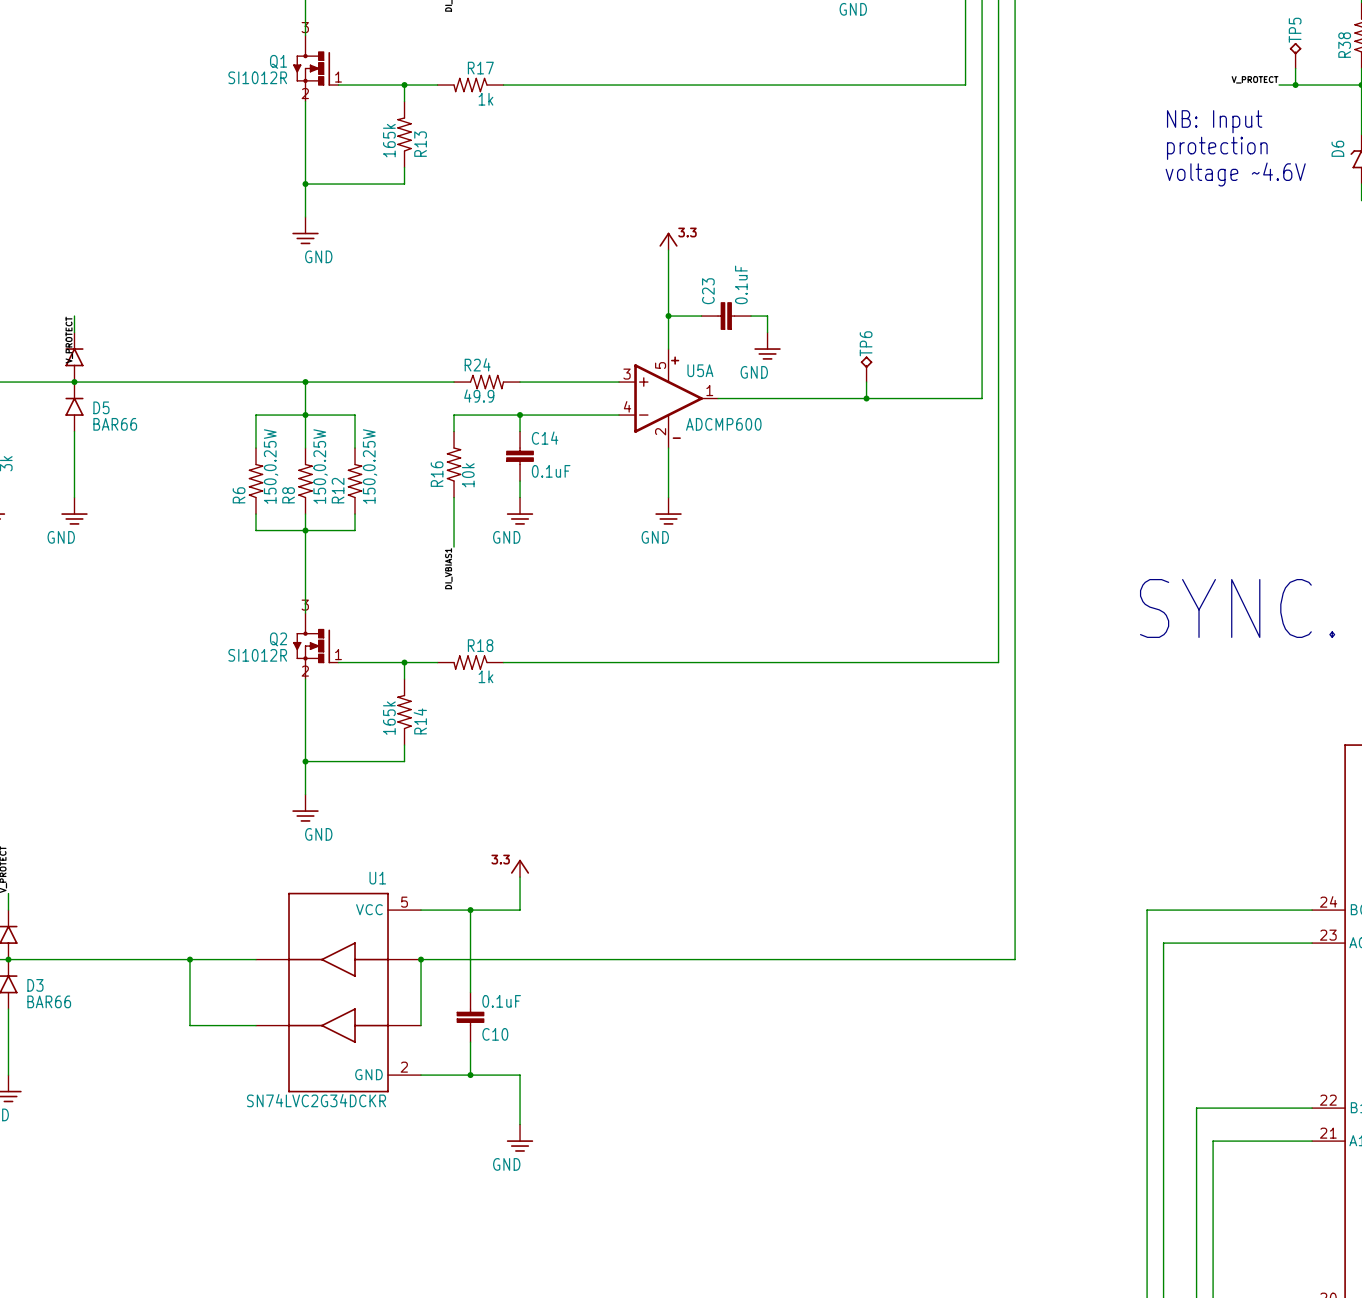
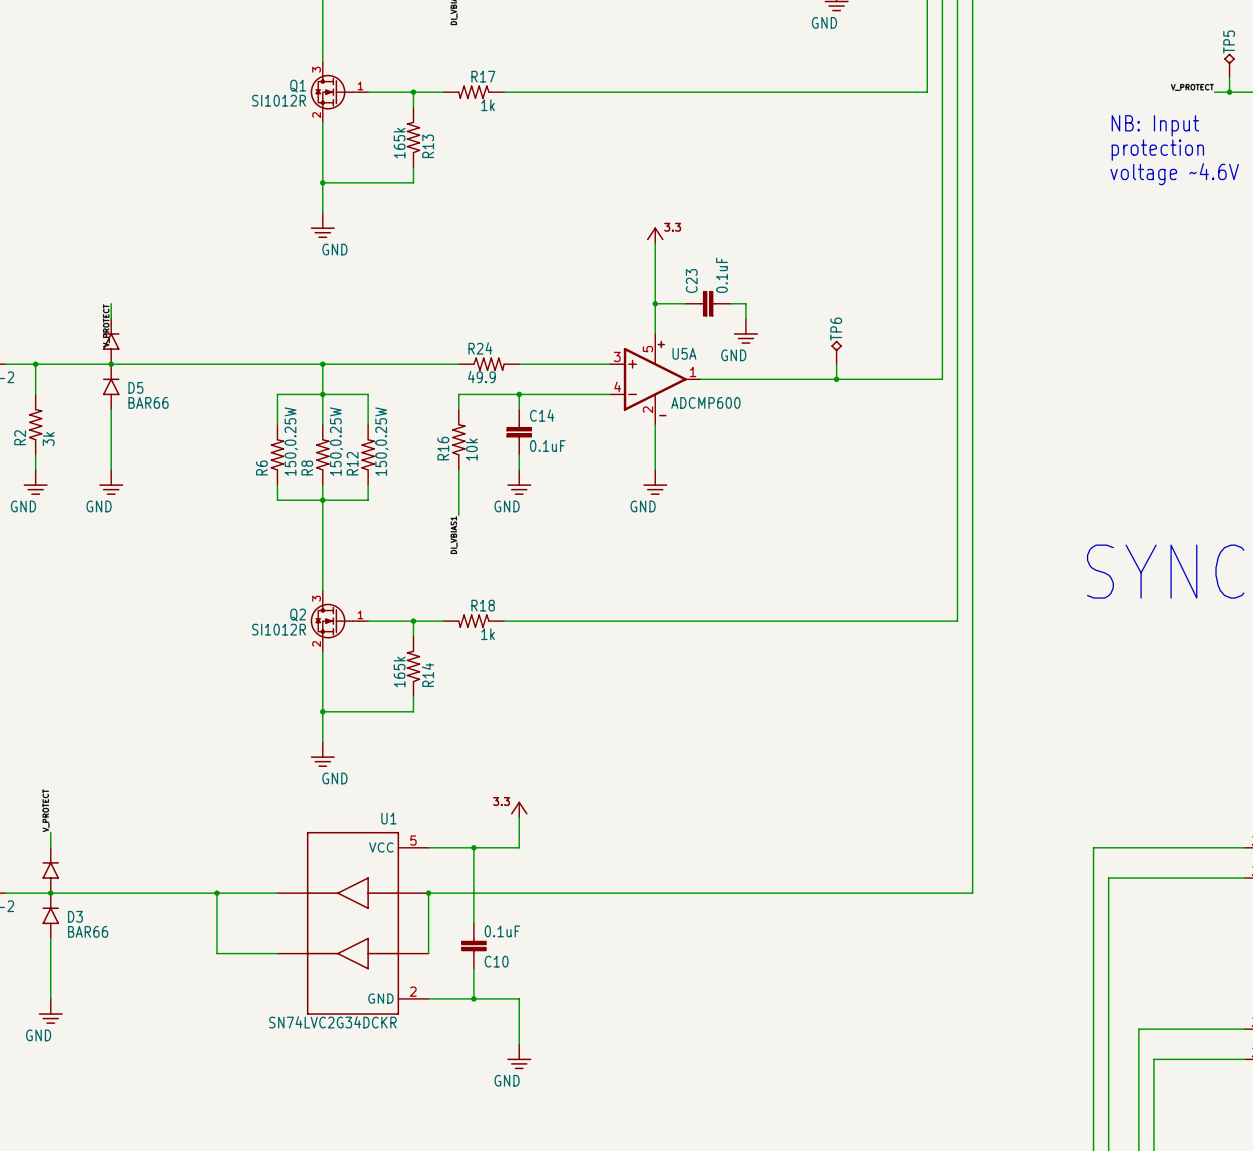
Q1 symbol: [293, 35, 340, 103] -> [310, 61, 369, 123]
Q2 symbol: [293, 612, 340, 680] -> [310, 590, 369, 652]

